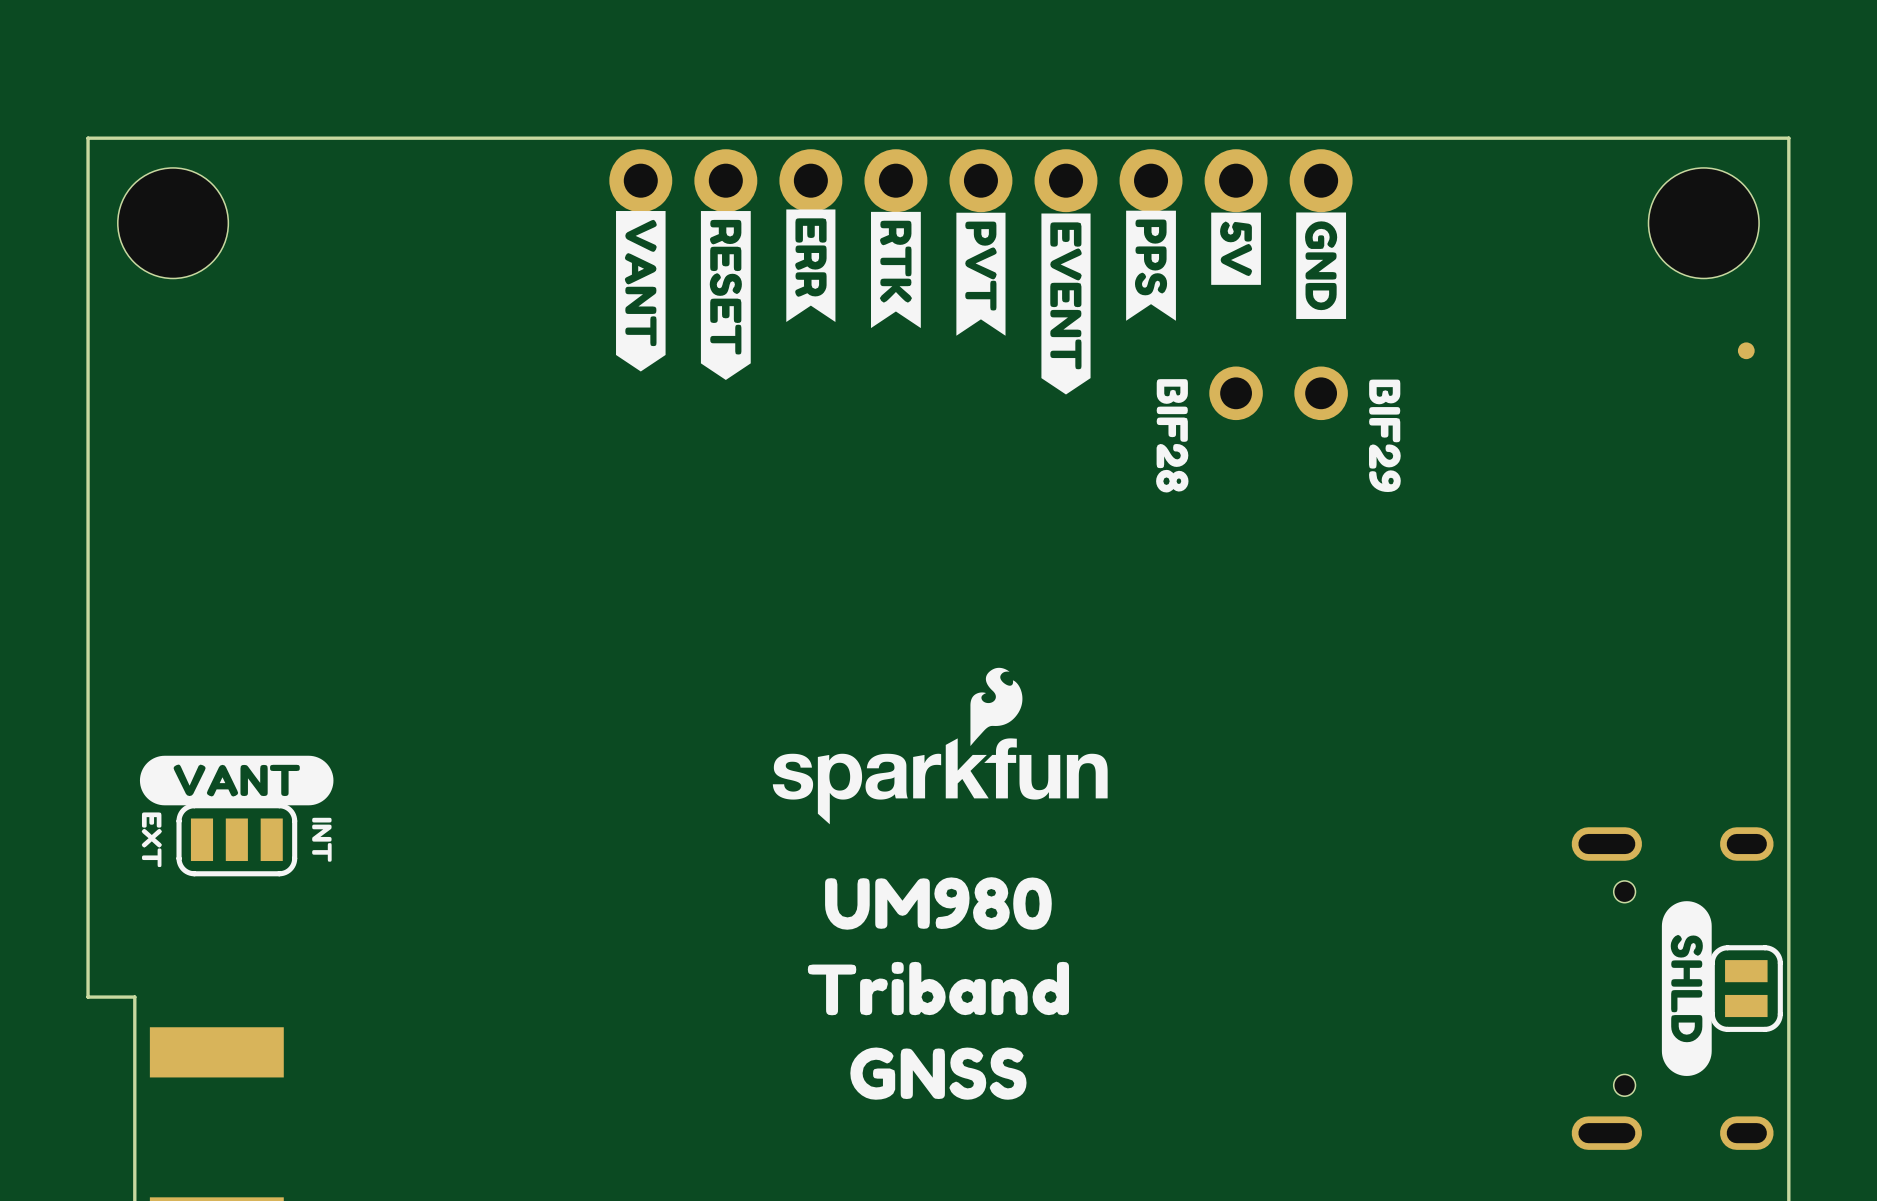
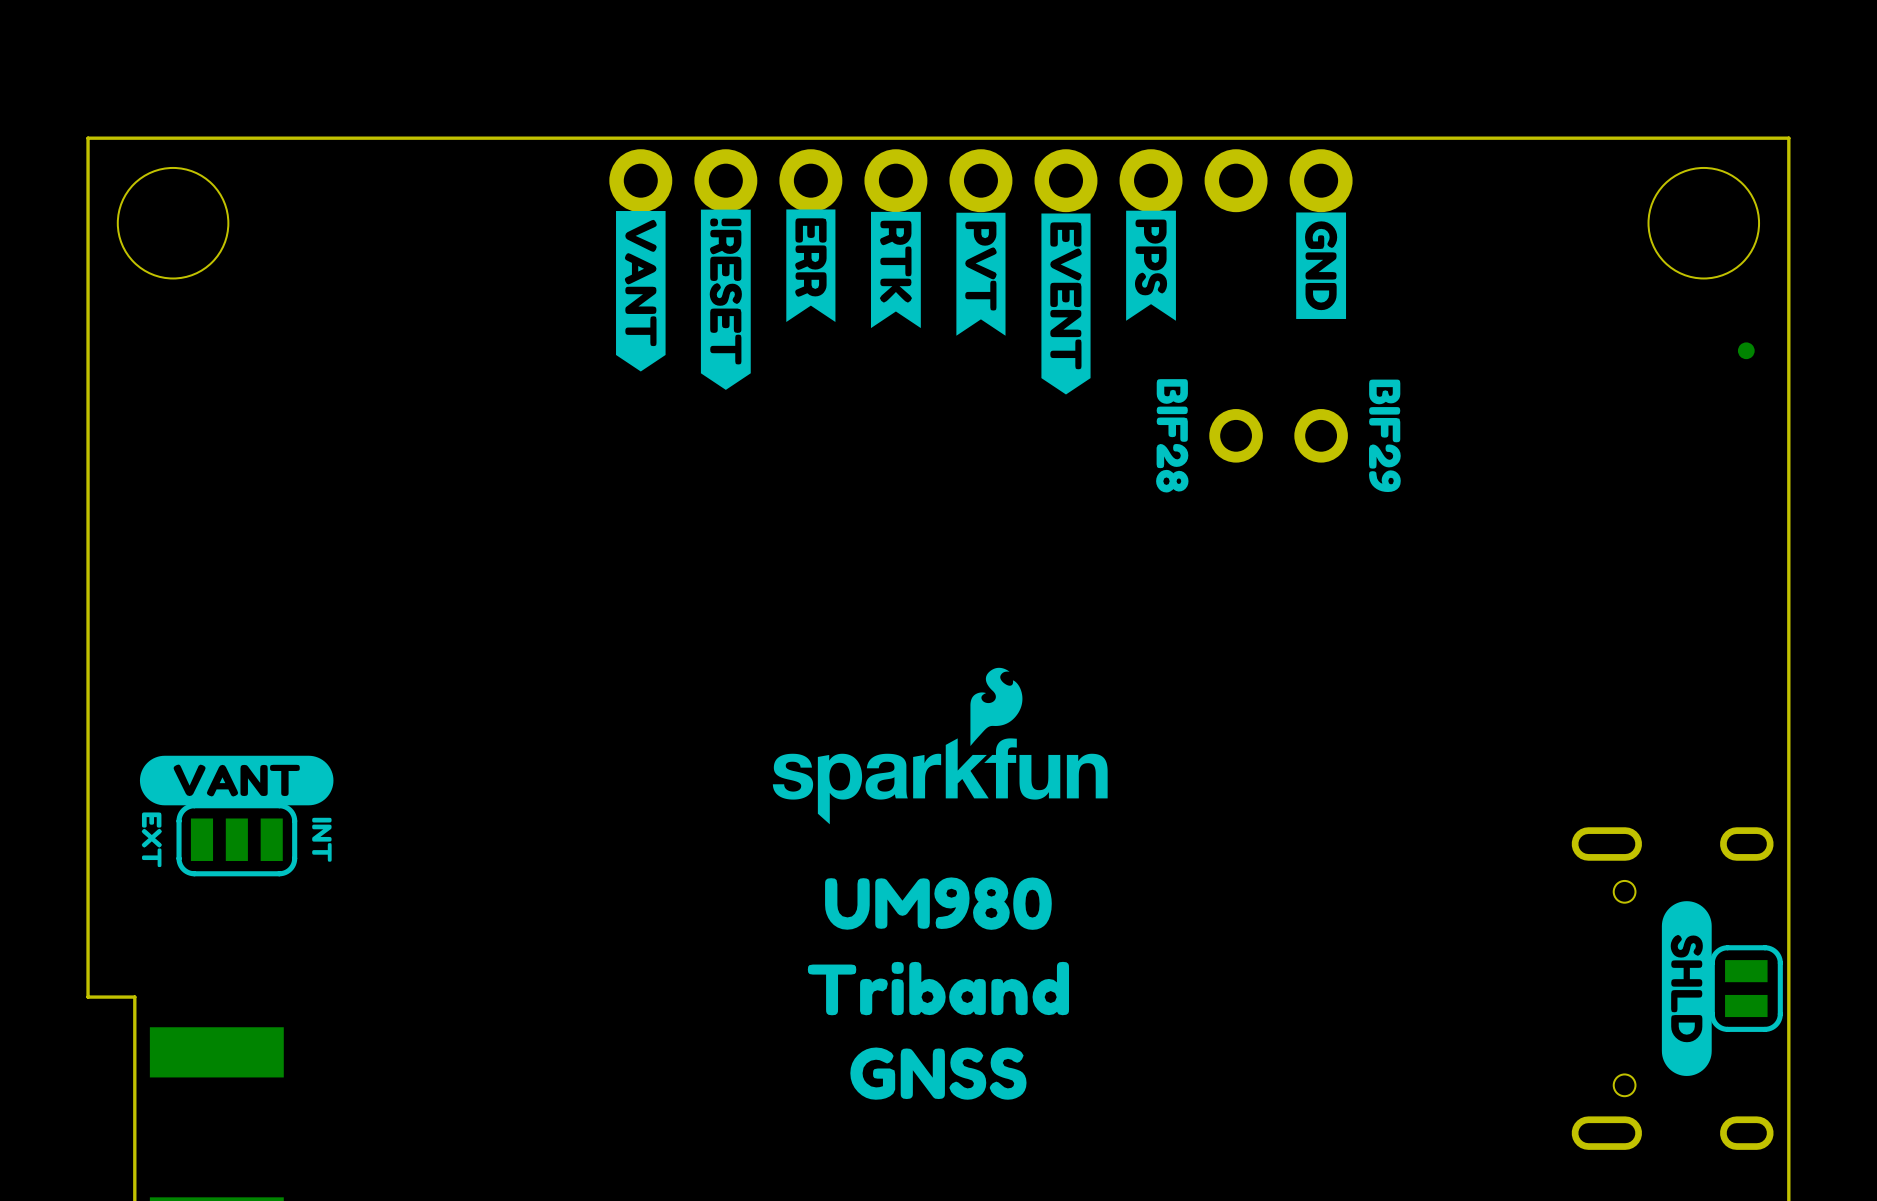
drawing shape: [700, 211, 751, 380] -> [700, 209, 751, 390]
drawing: [1211, 212, 1261, 285] -> none
part position: (1236, 393) -> (1236, 435)
part position: (1321, 393) -> (1321, 435)

